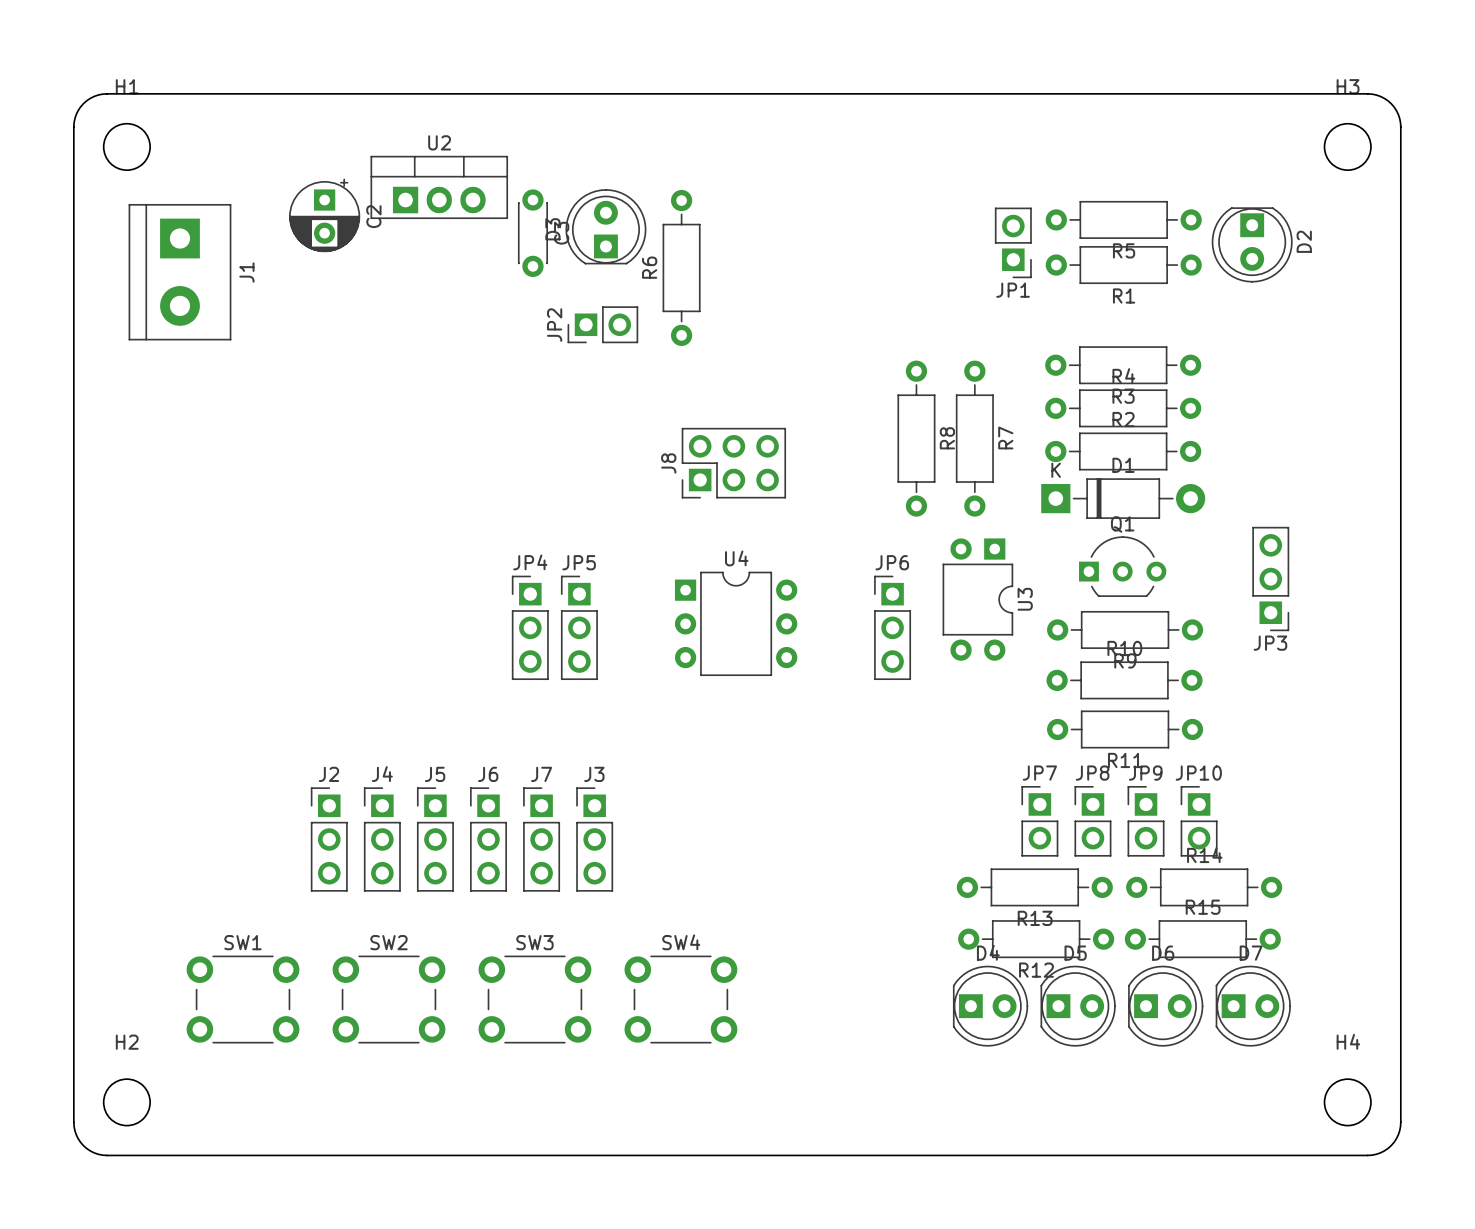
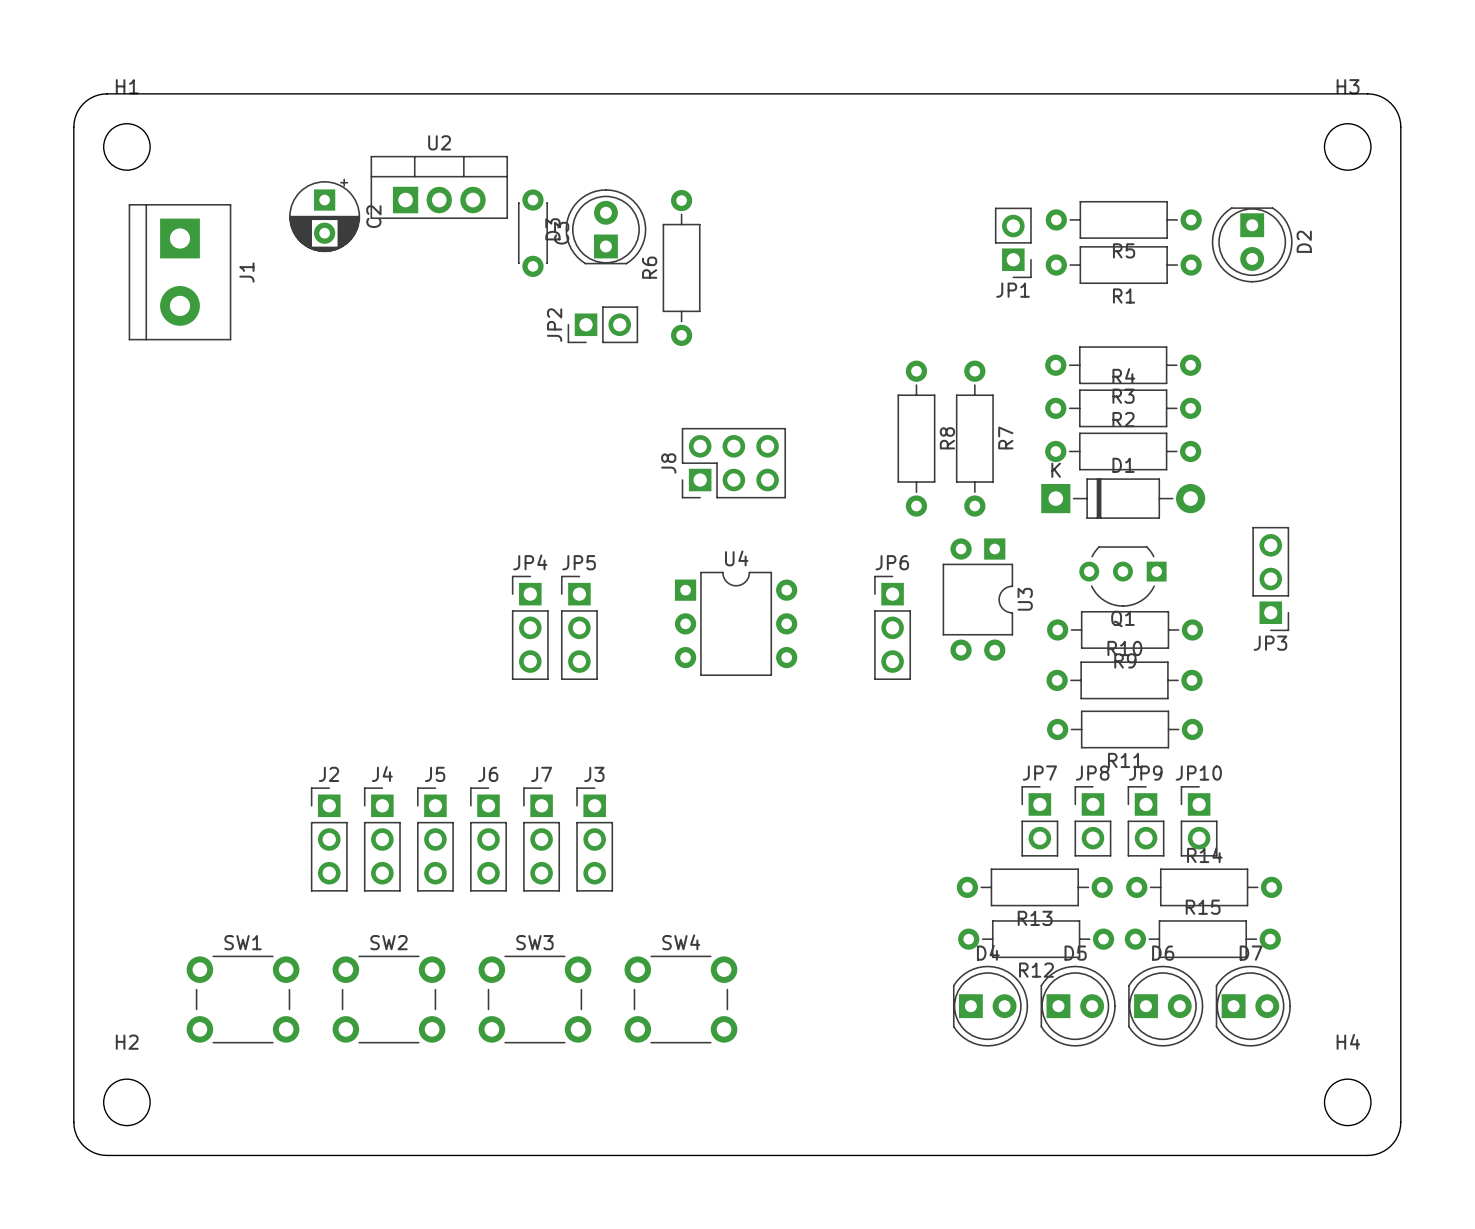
Q1 rotation: 0° (1122, 566) -> 180° (1122, 576)

